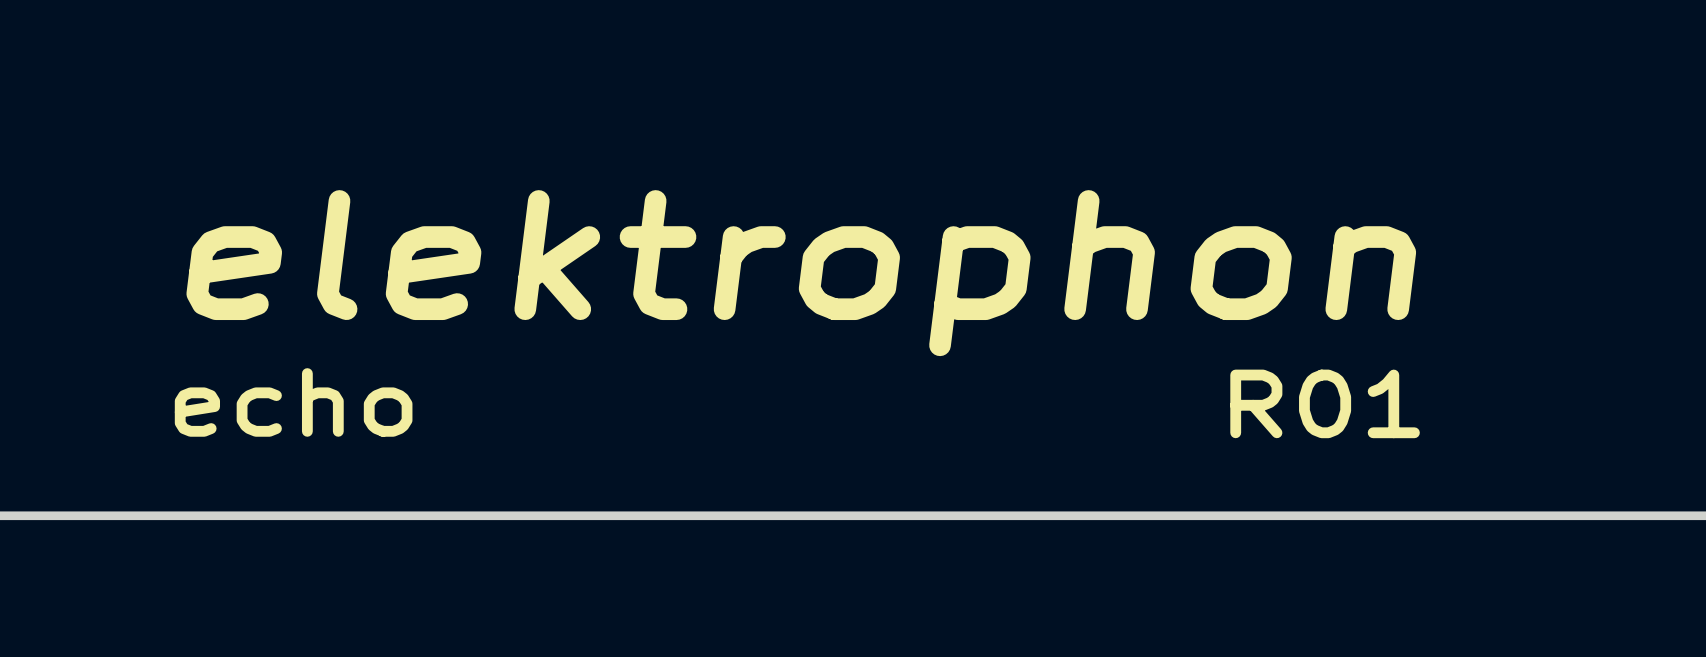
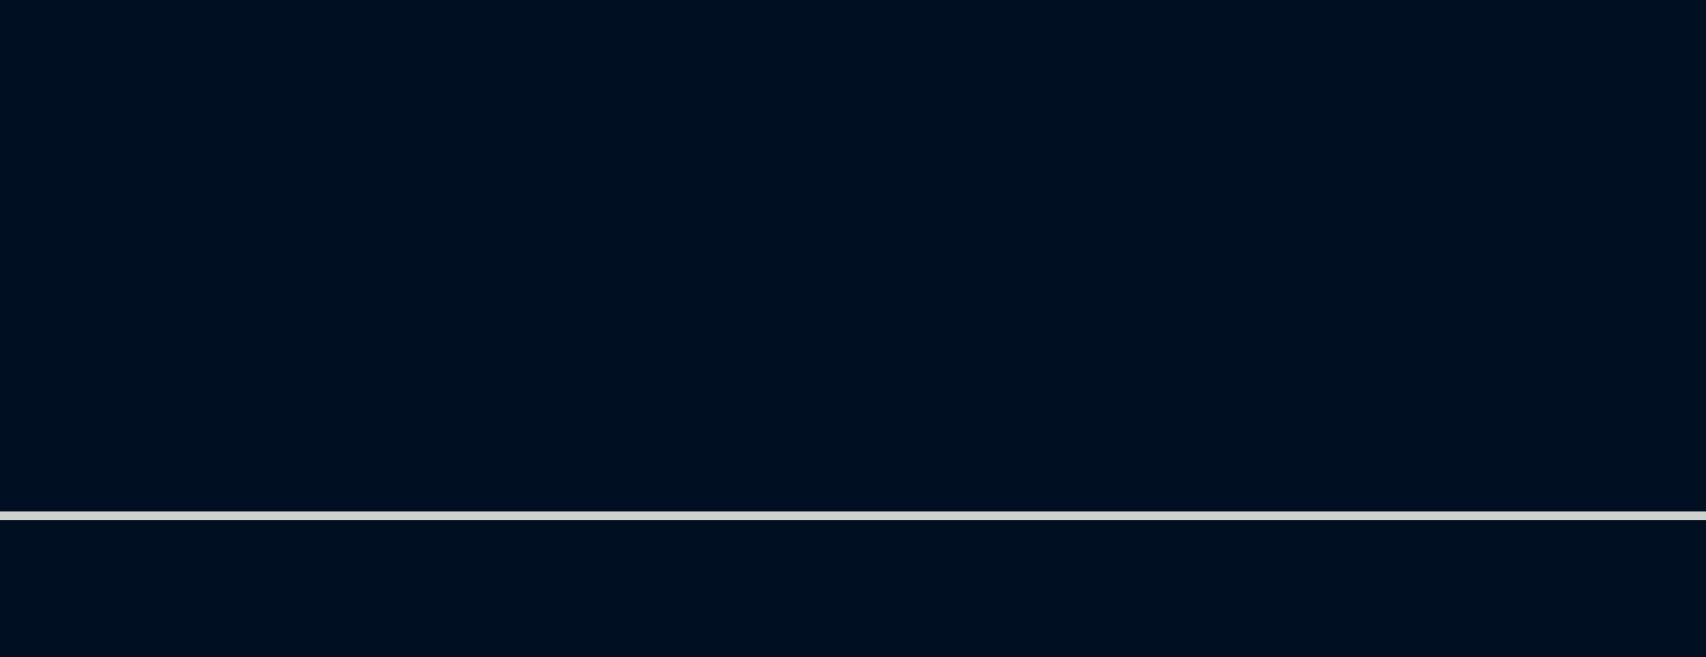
drawing: [174, 190, 1420, 439] -> none

